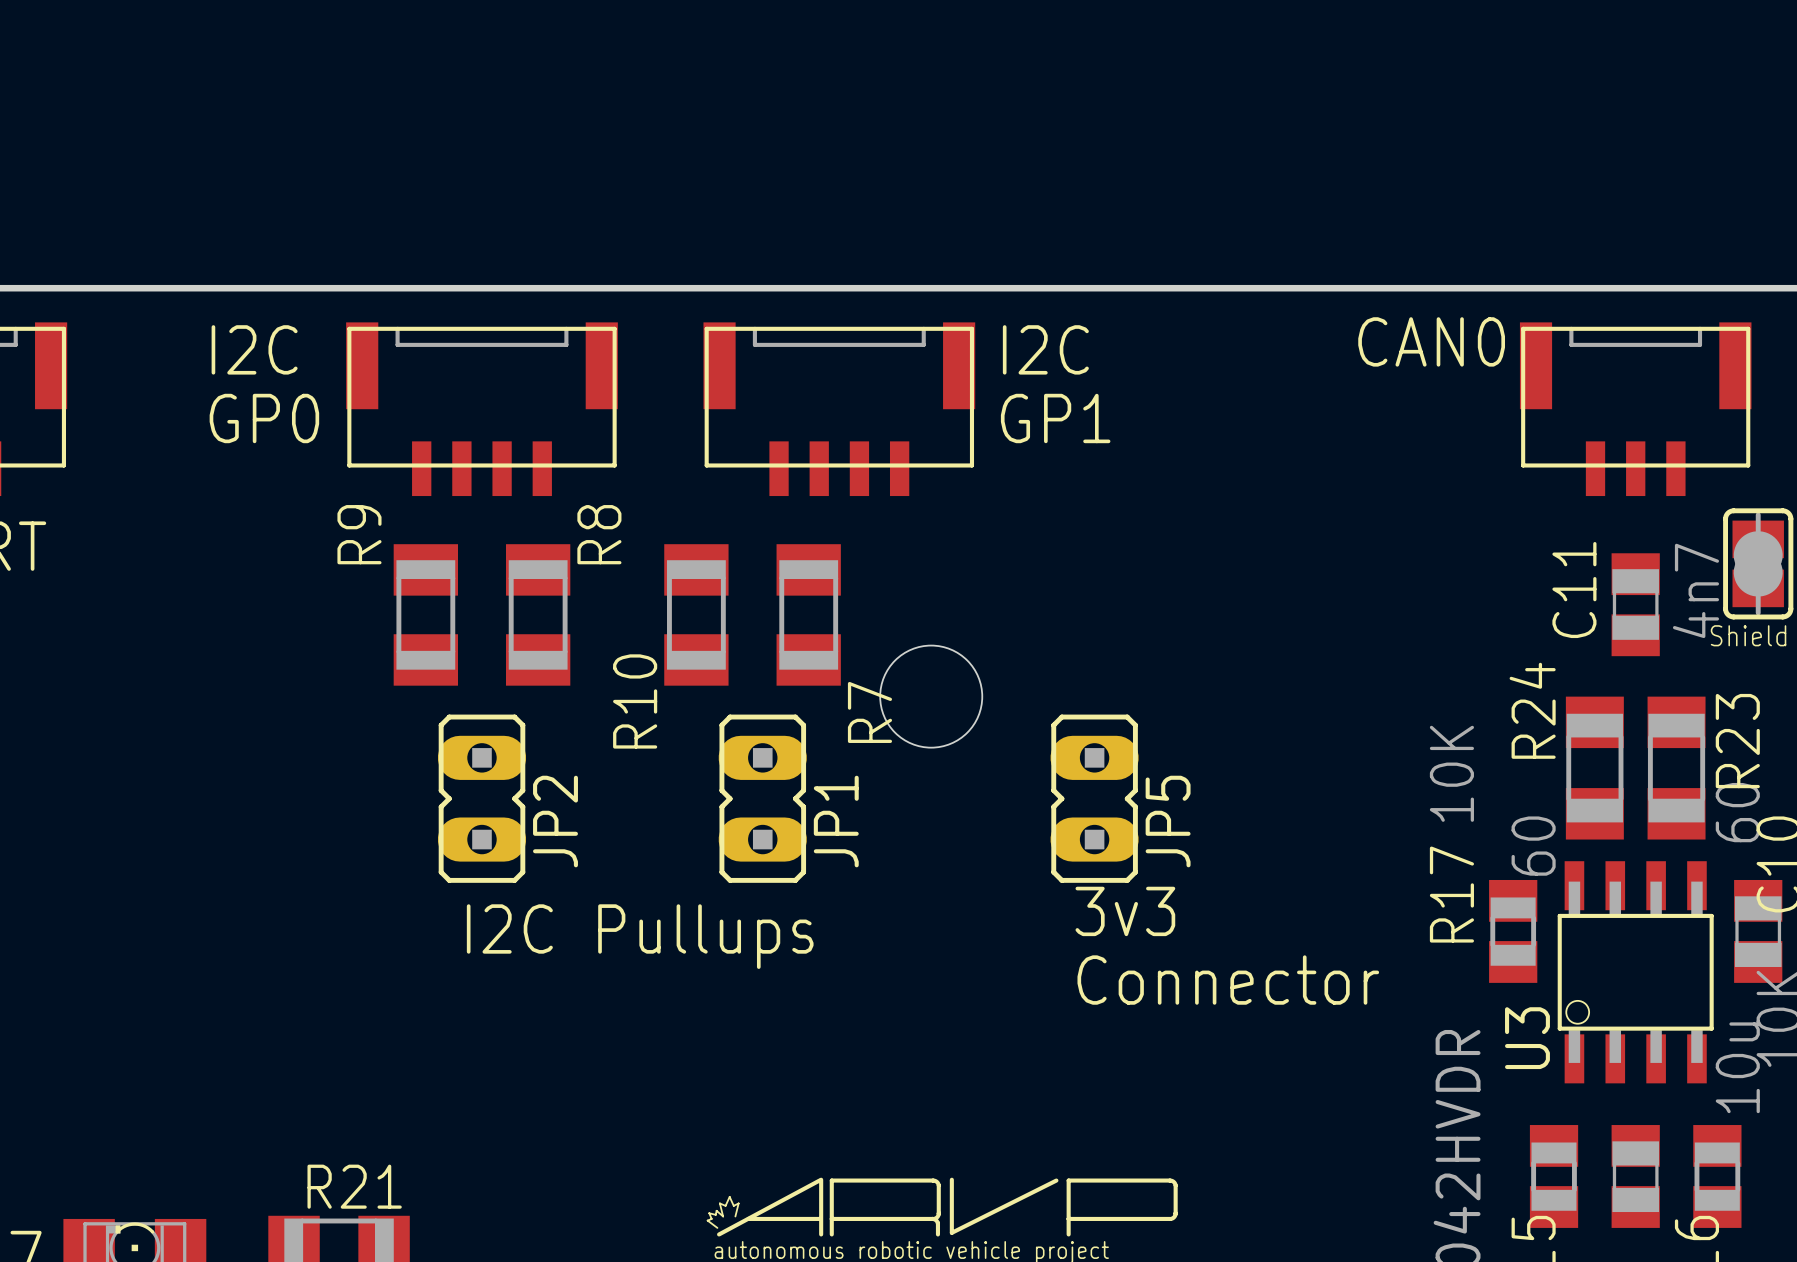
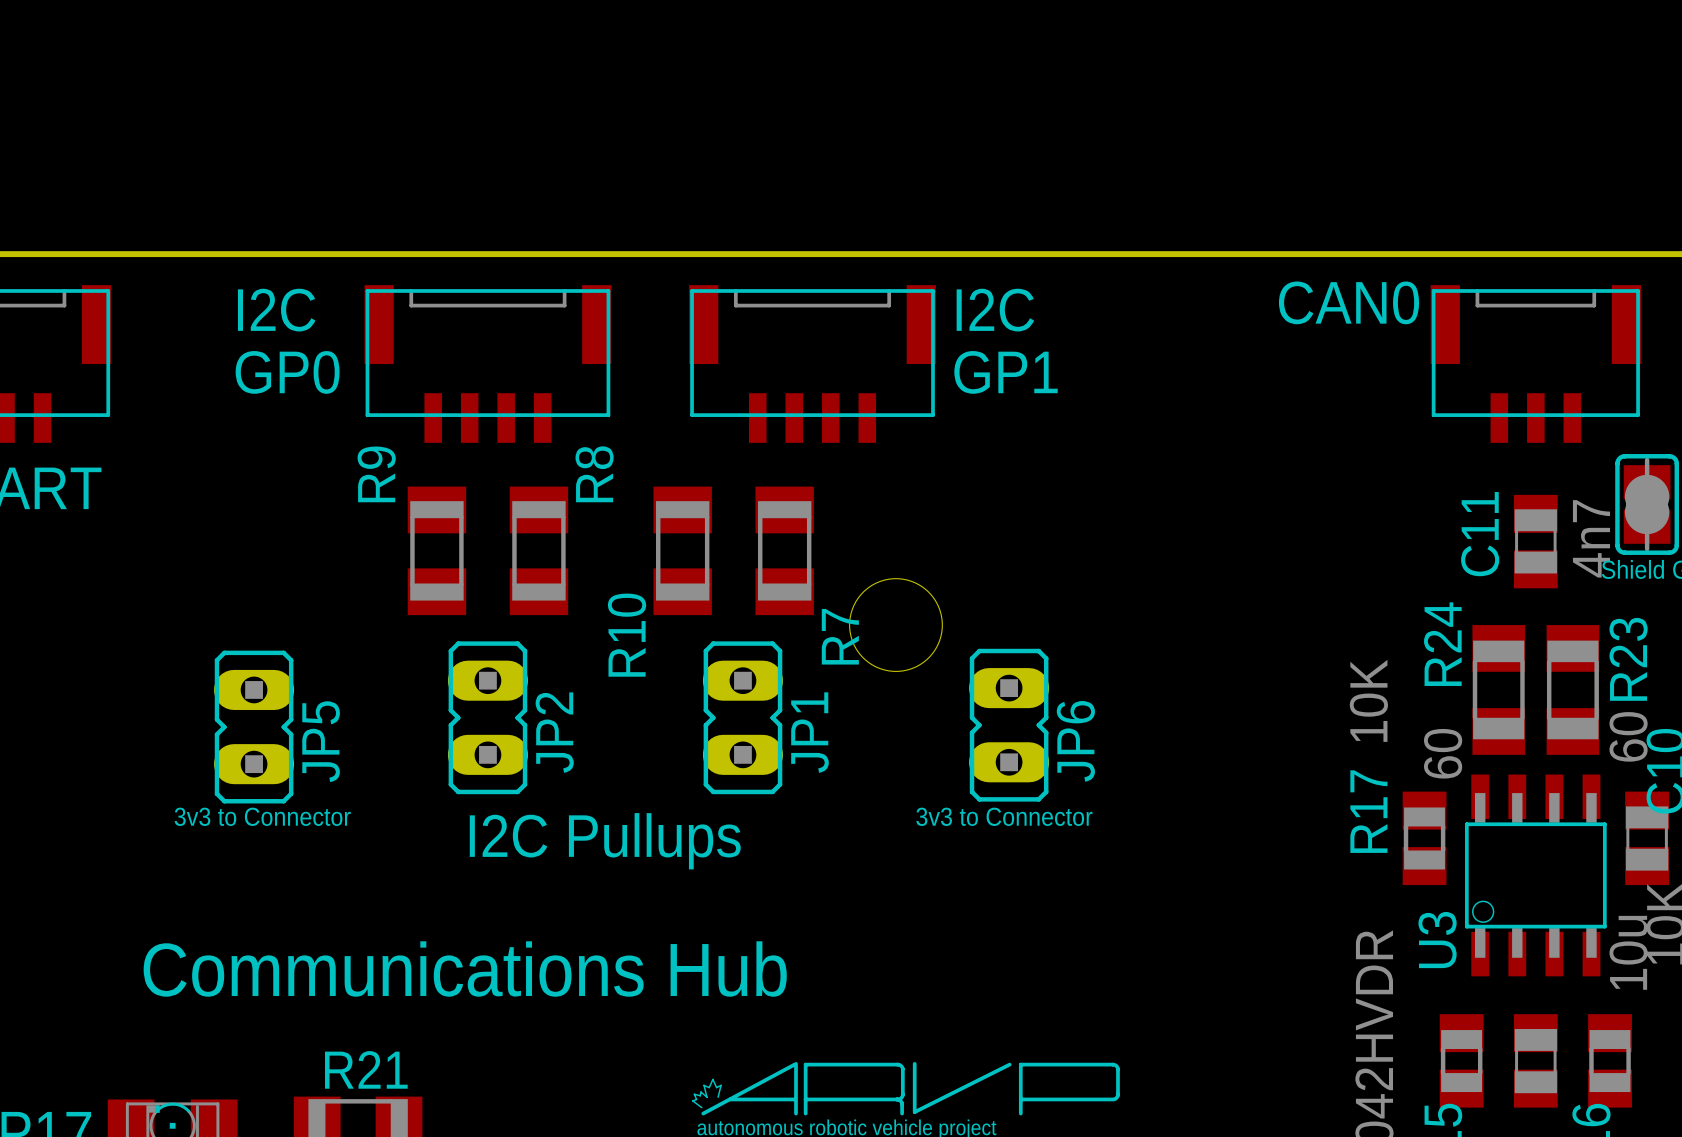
JP5 position: (1094, 798) -> (254, 727)
JP6: none -> (1009, 725)
text: none -> 3v3 to Connector (262, 816)
text: none -> 3v3 to Connector (1004, 816)
text: 3v3 (1125, 911) -> none
text: Connector (1228, 980) -> none
text: none -> Communications Hub (465, 969)

